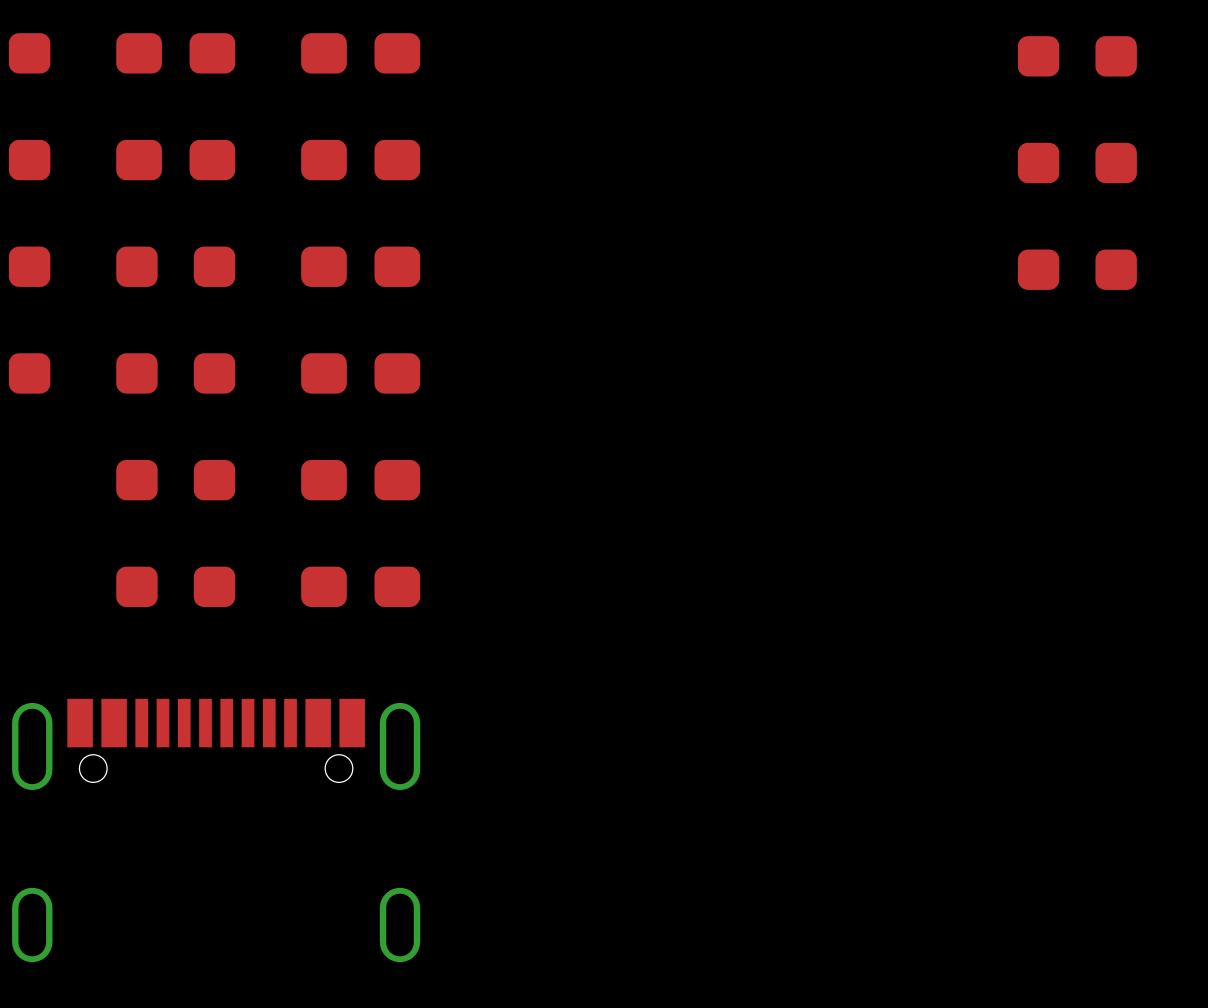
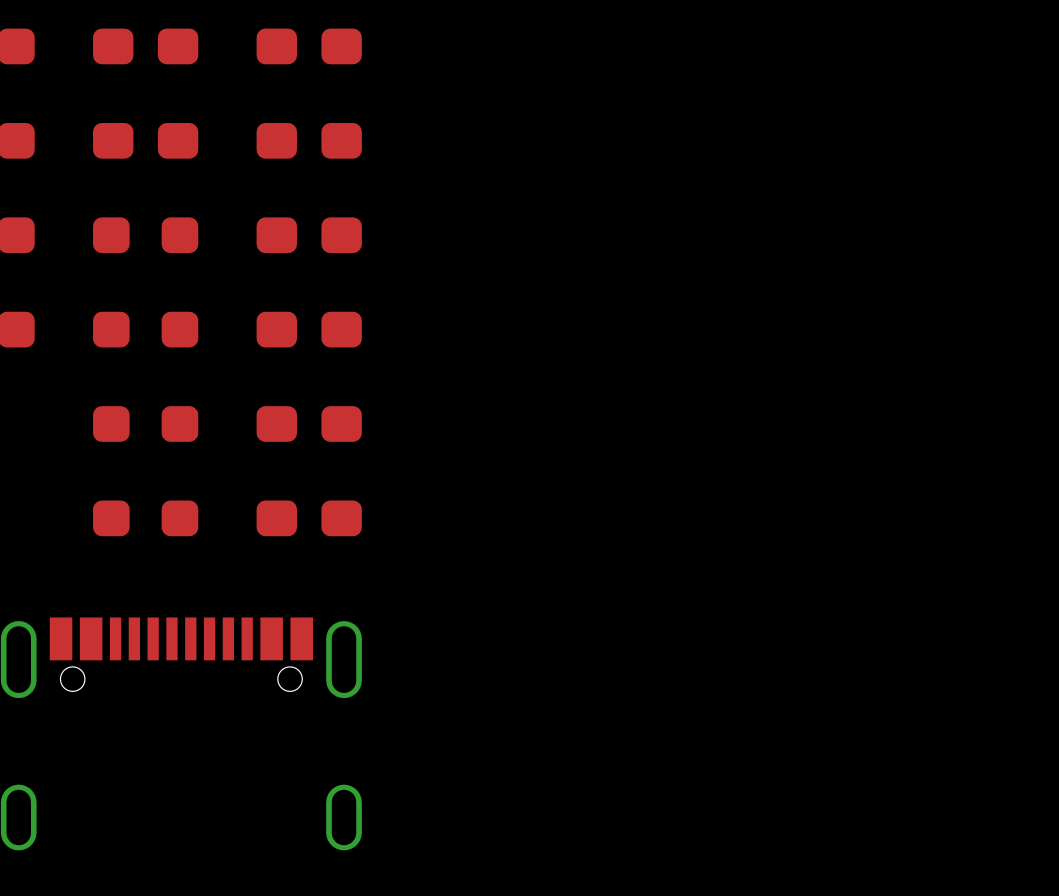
part: (1077, 56) -> none
part: (1077, 163) -> none
part: (1077, 269) -> none

